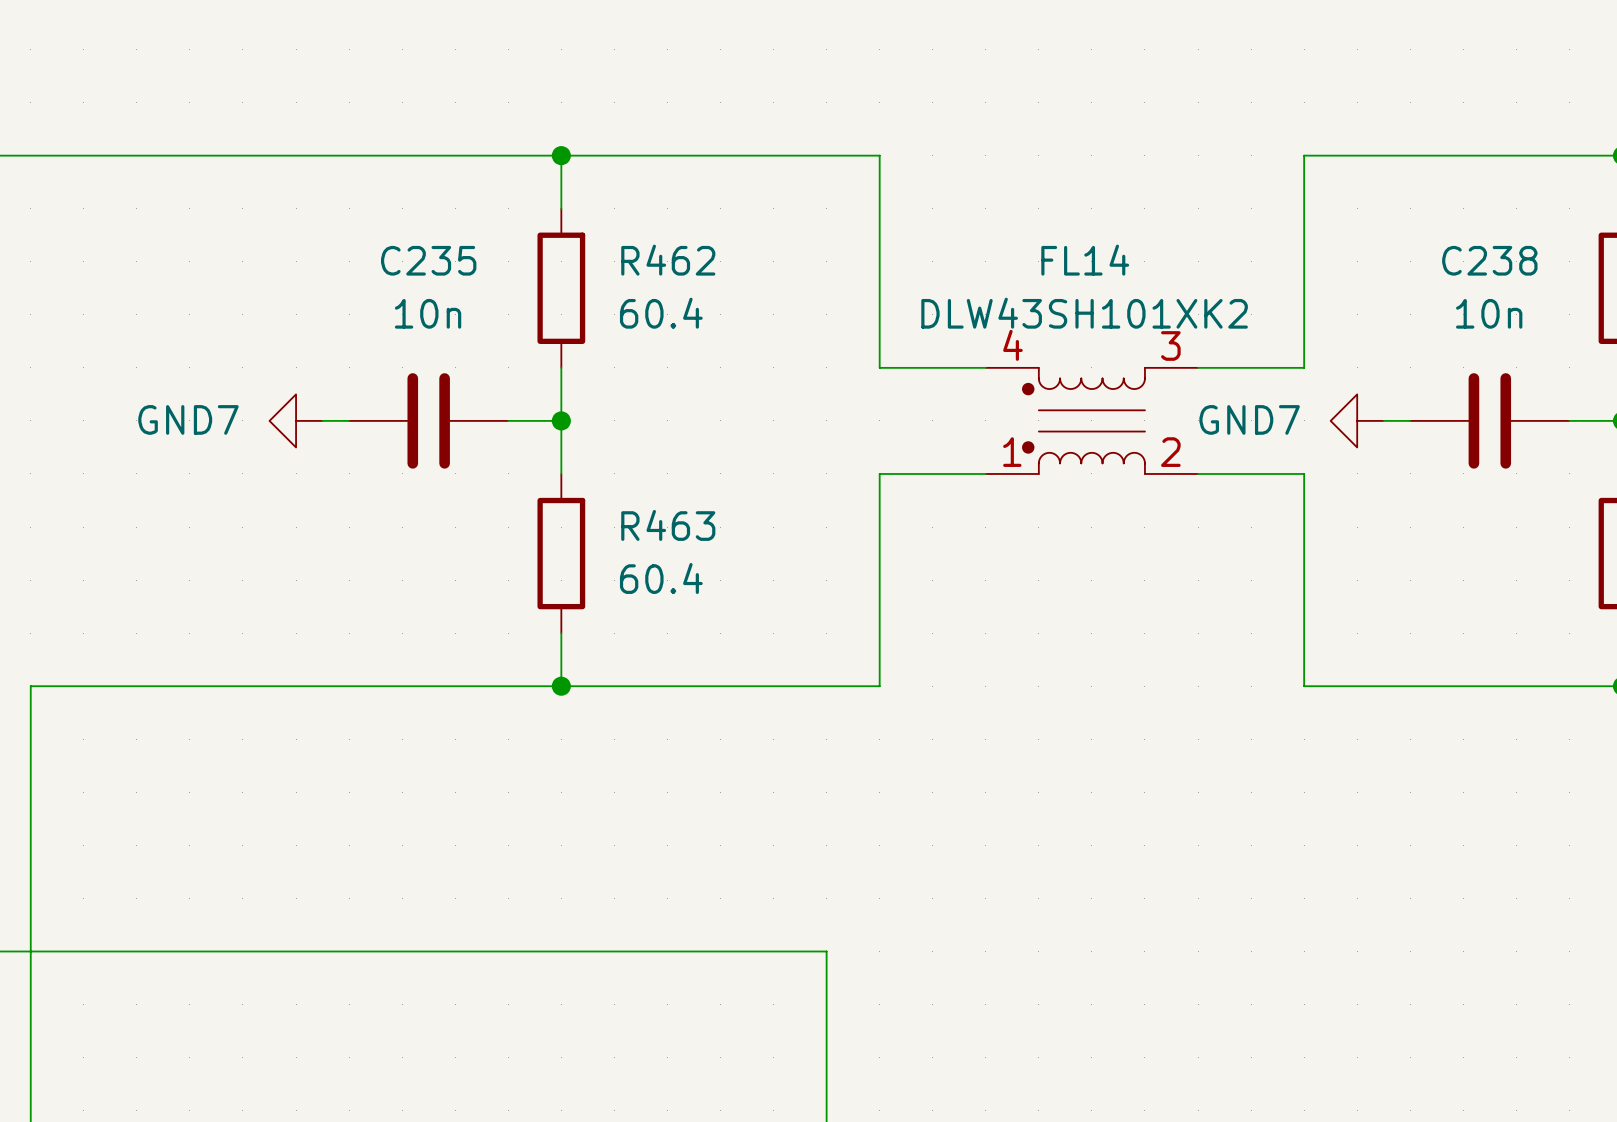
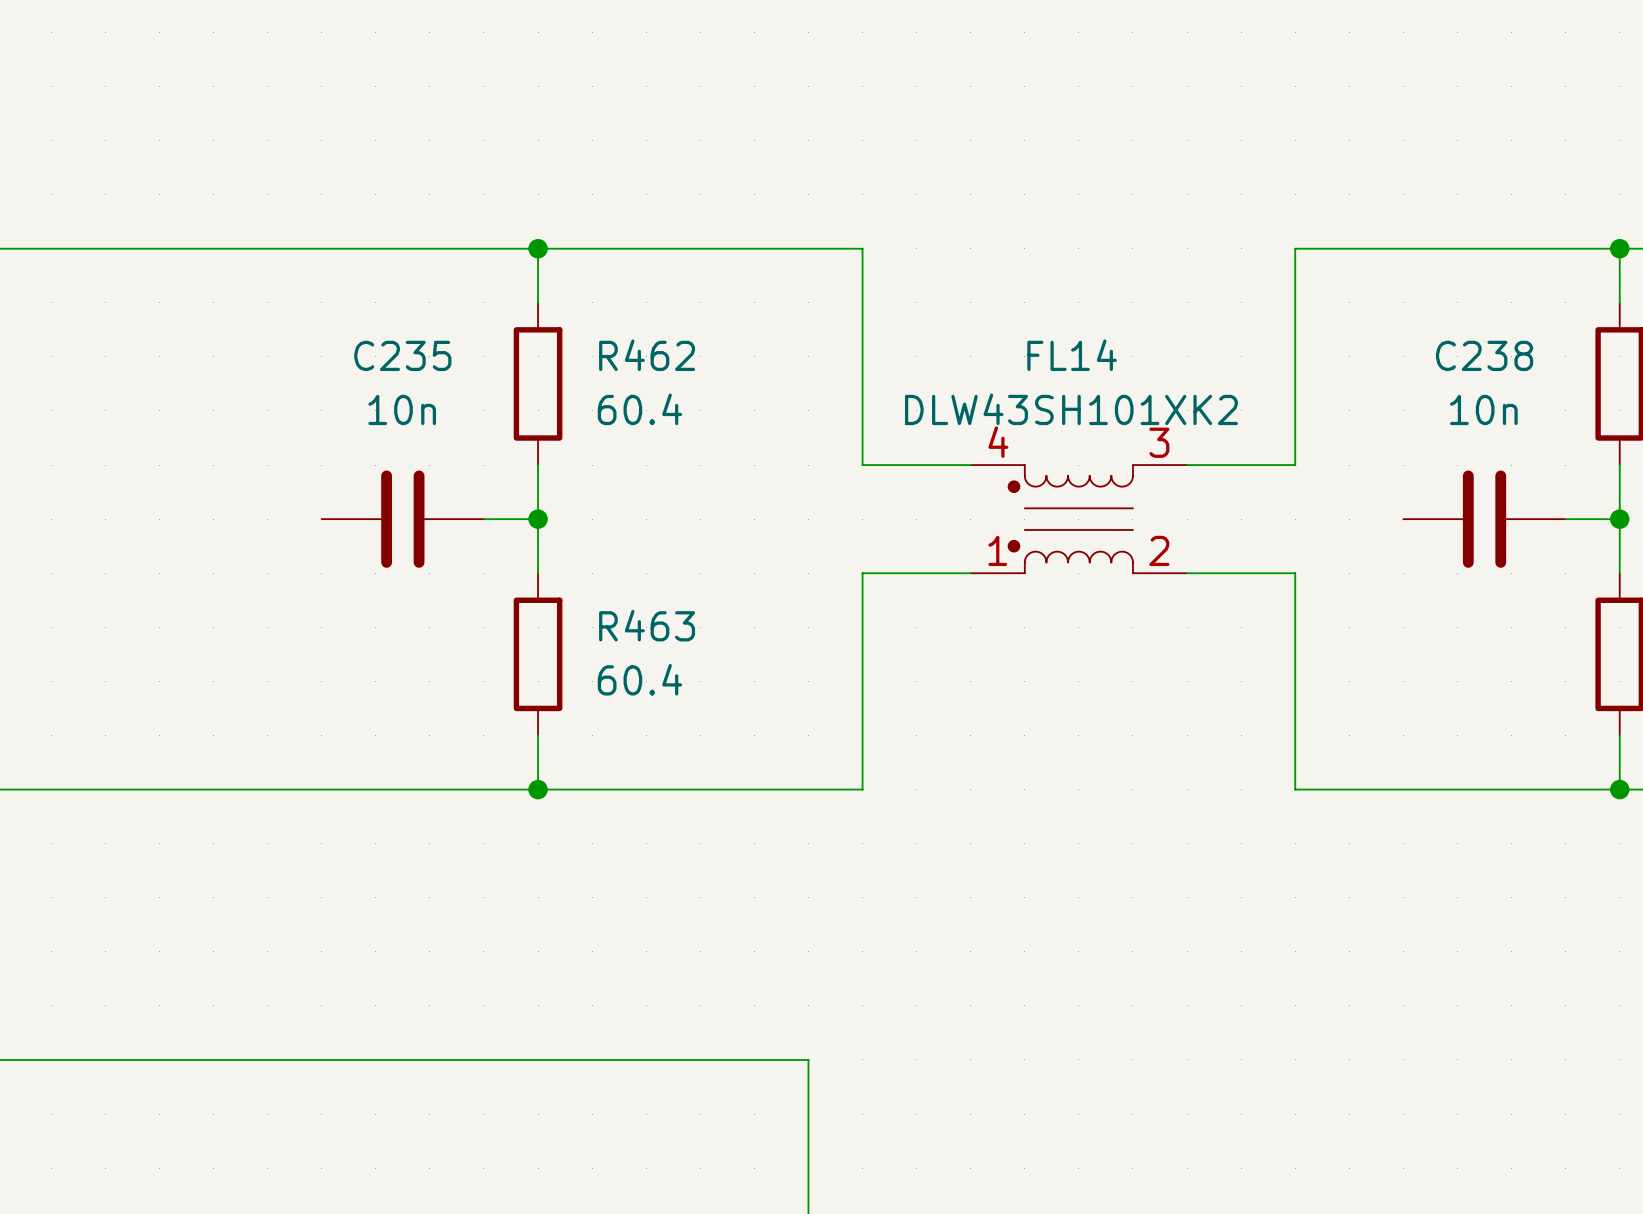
power symbol: GND7 (296, 420) -> none
wire: (322, 420) (349, 420) -> none
power symbol: GND7 (1357, 420) -> none
wire: (1383, 420) (1410, 420) -> none

